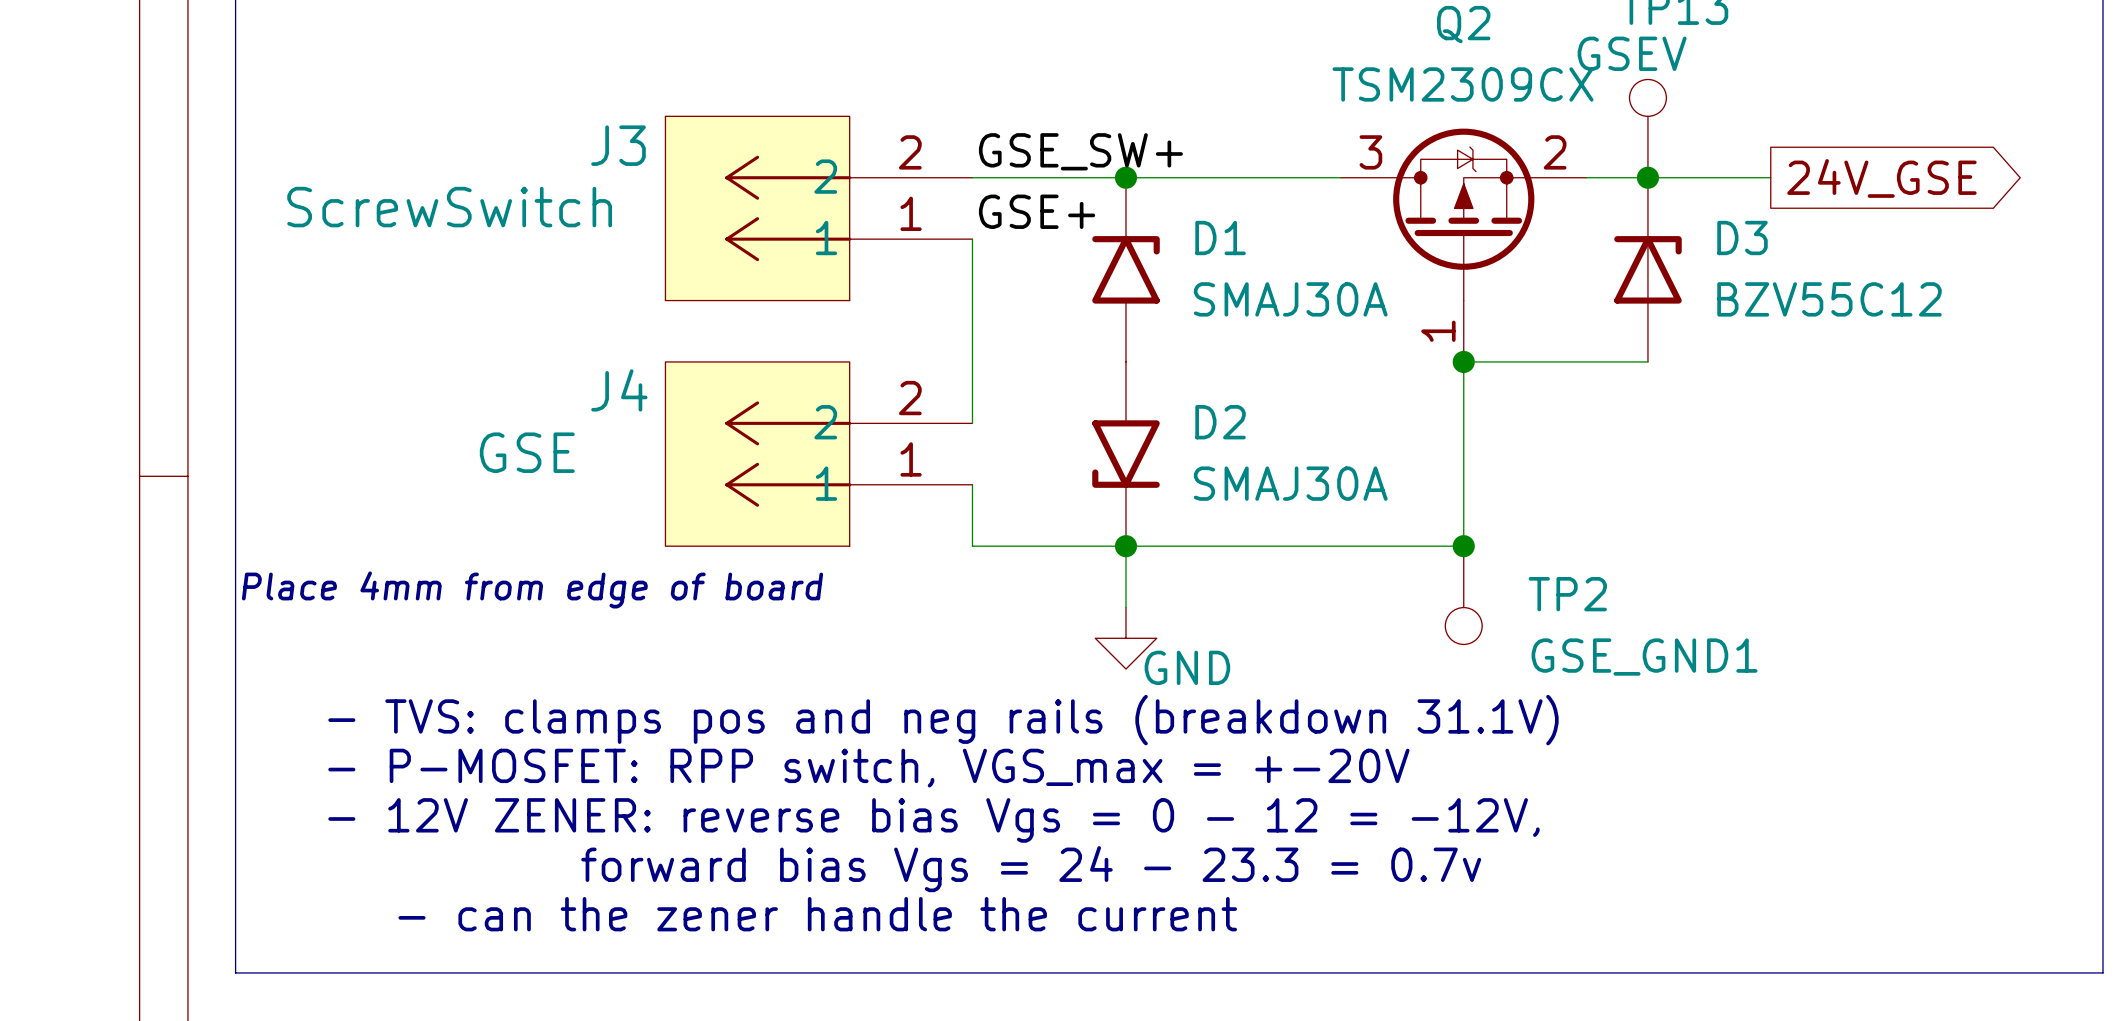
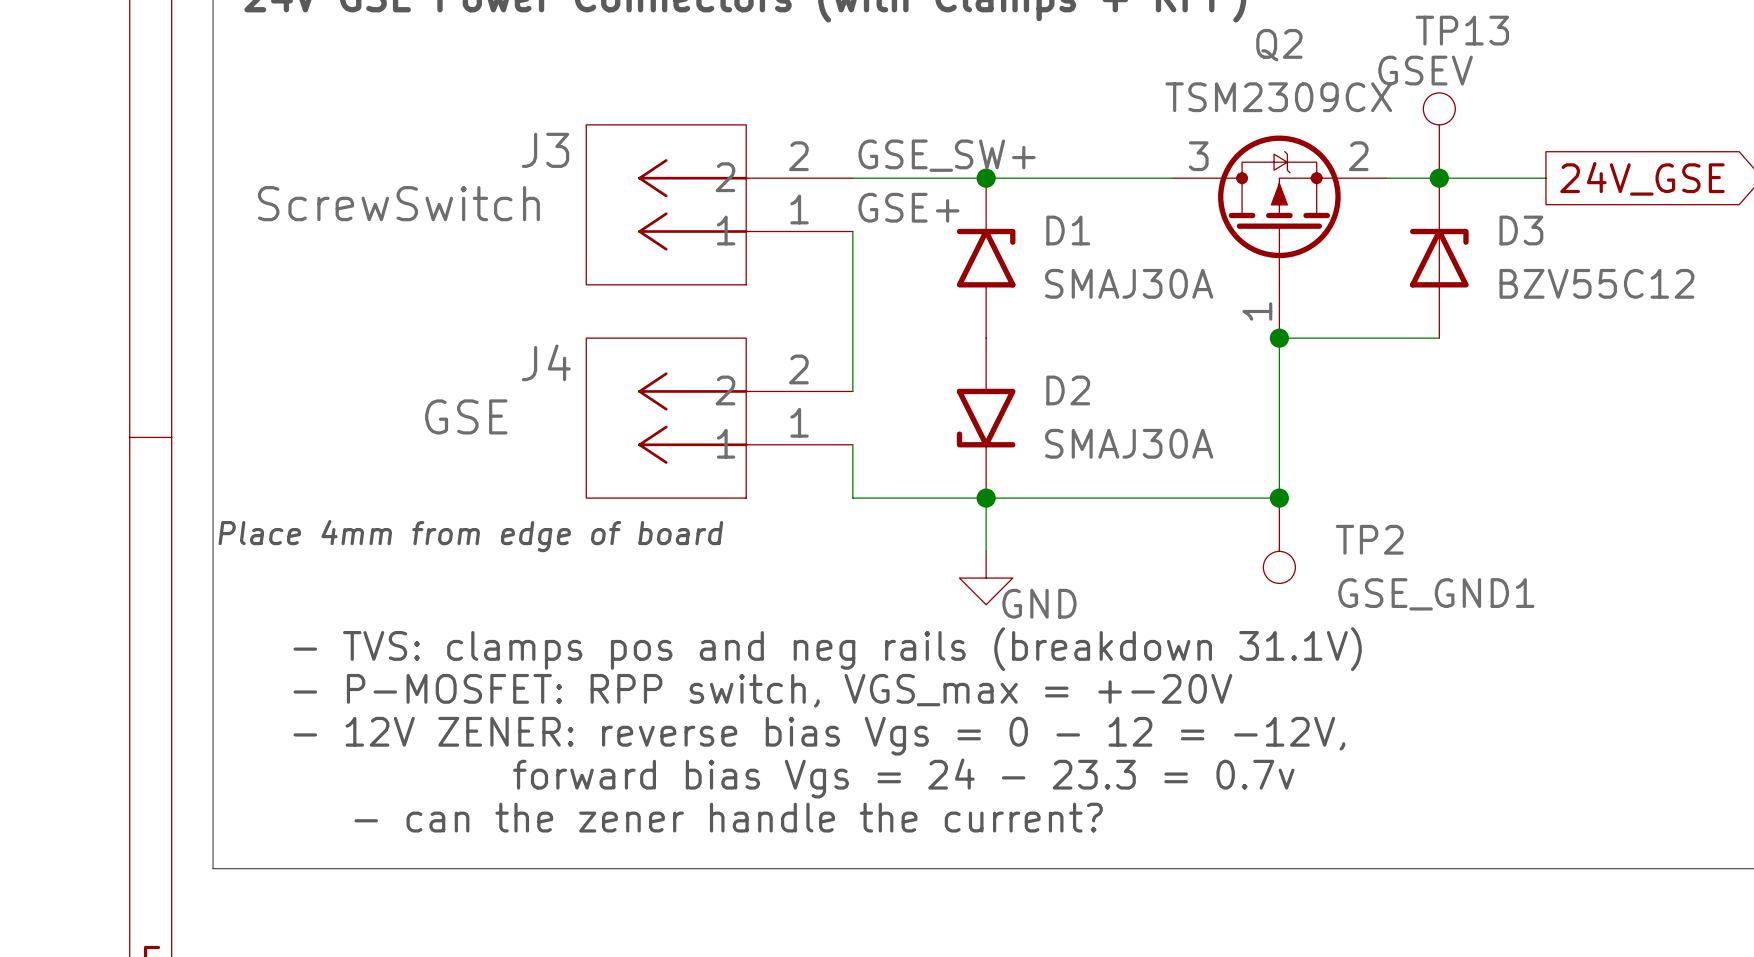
text: - can the zener handle the current (817, 914) -> - can the zener handle the current? (728, 817)

